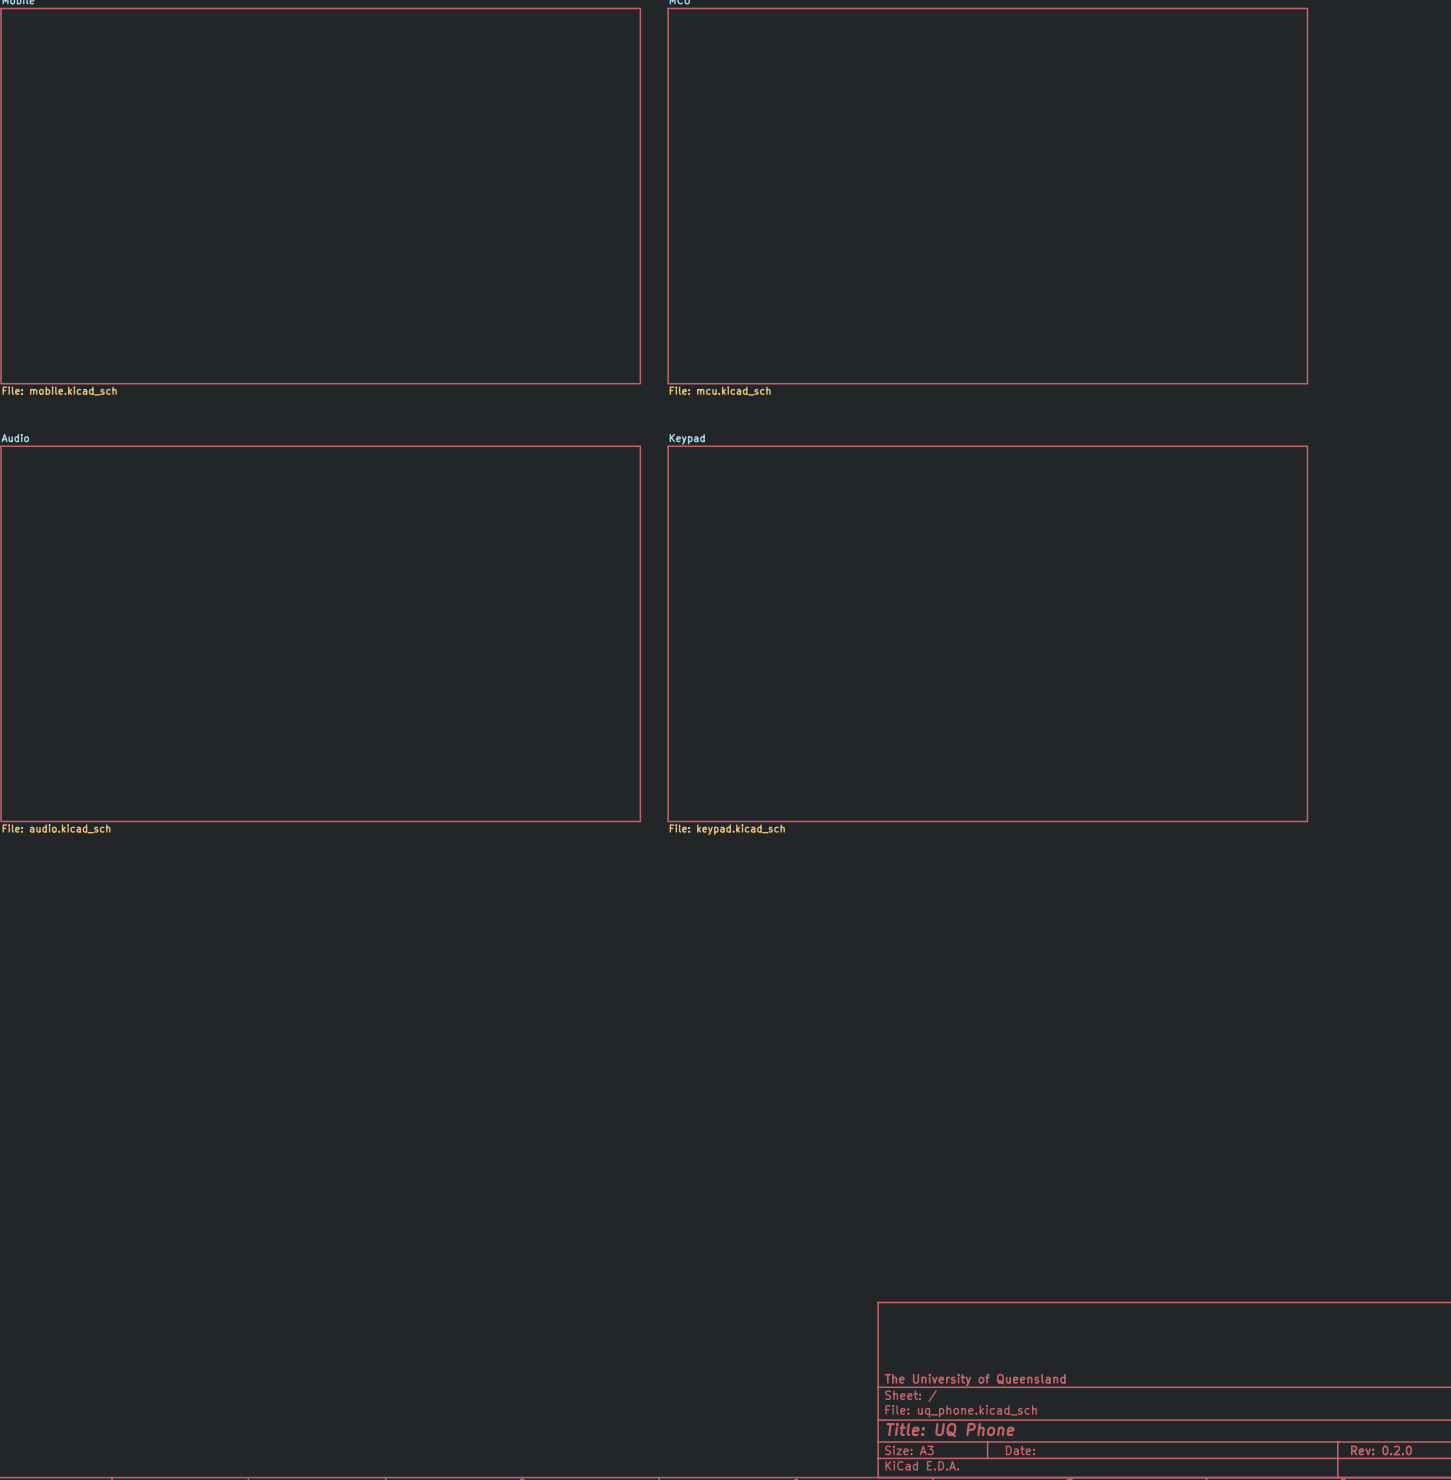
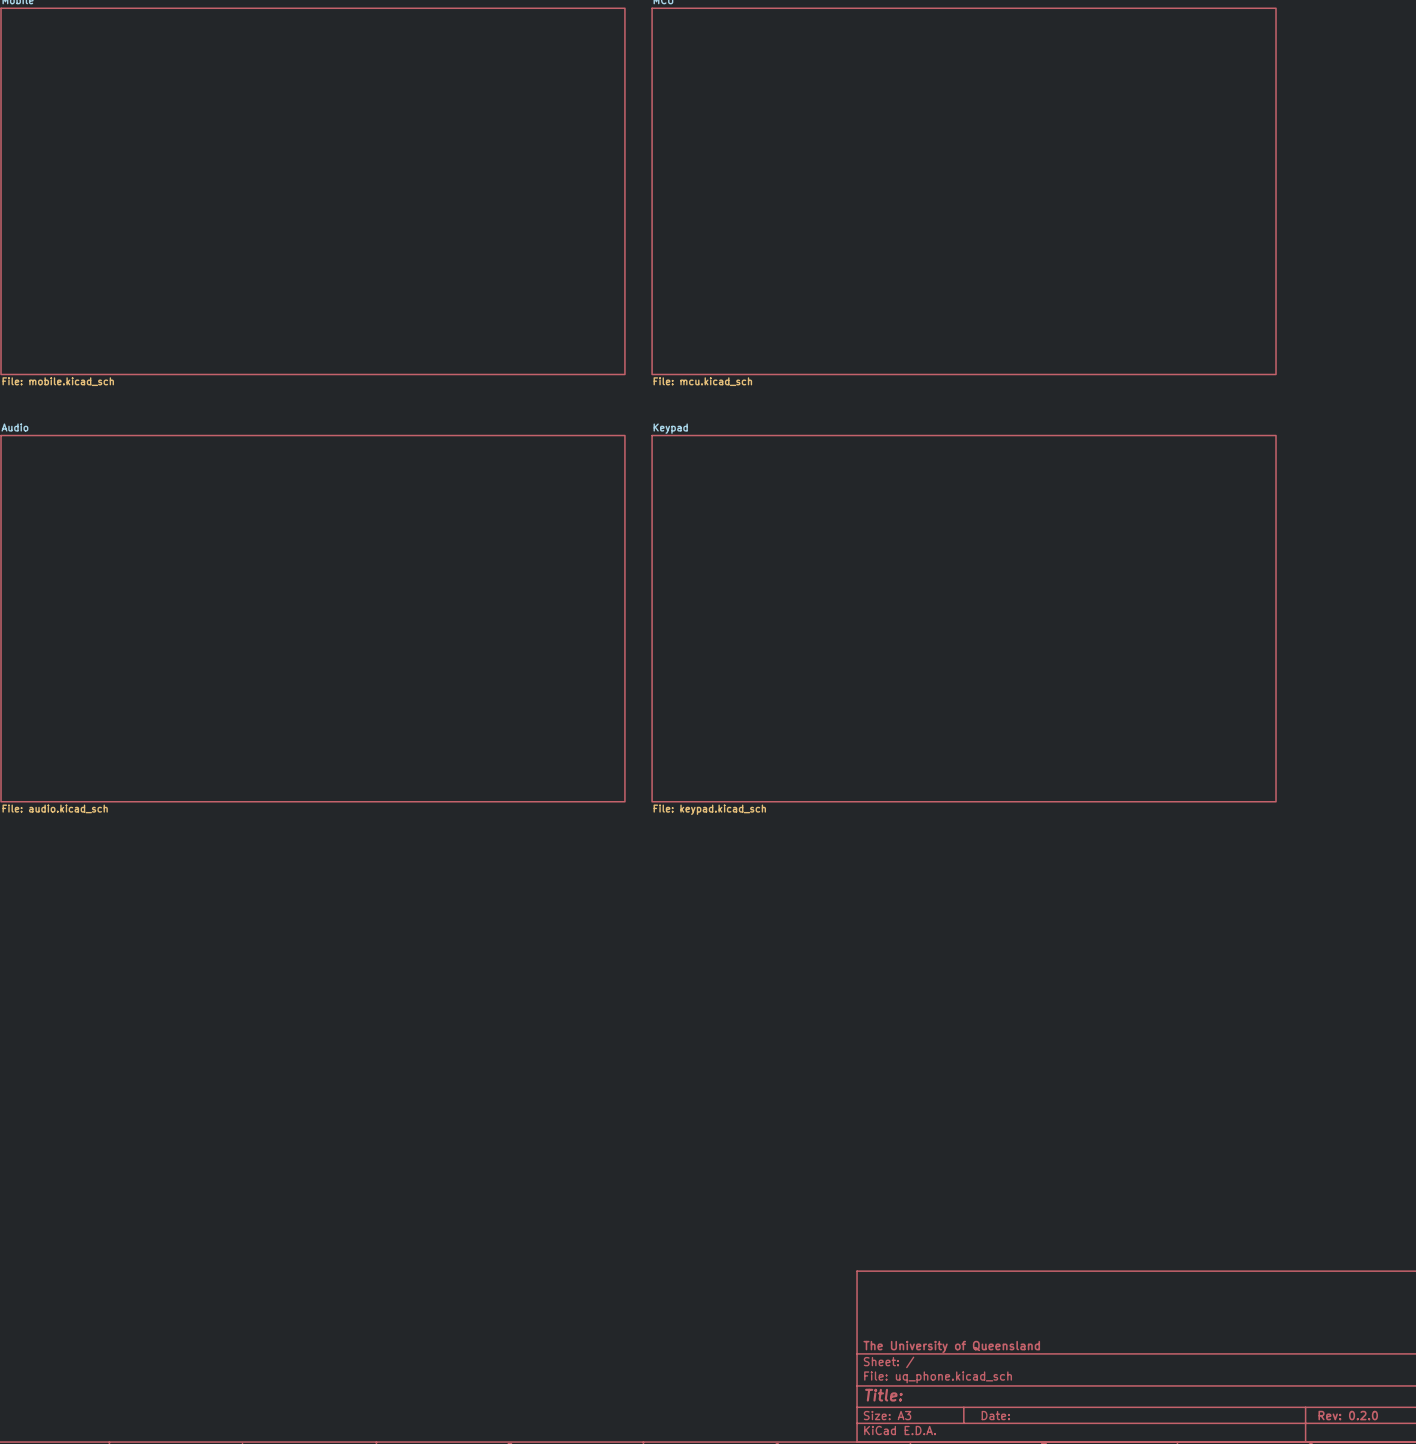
title block: Title: UQ Phone (950, 1430) -> Title: (883, 1395)

